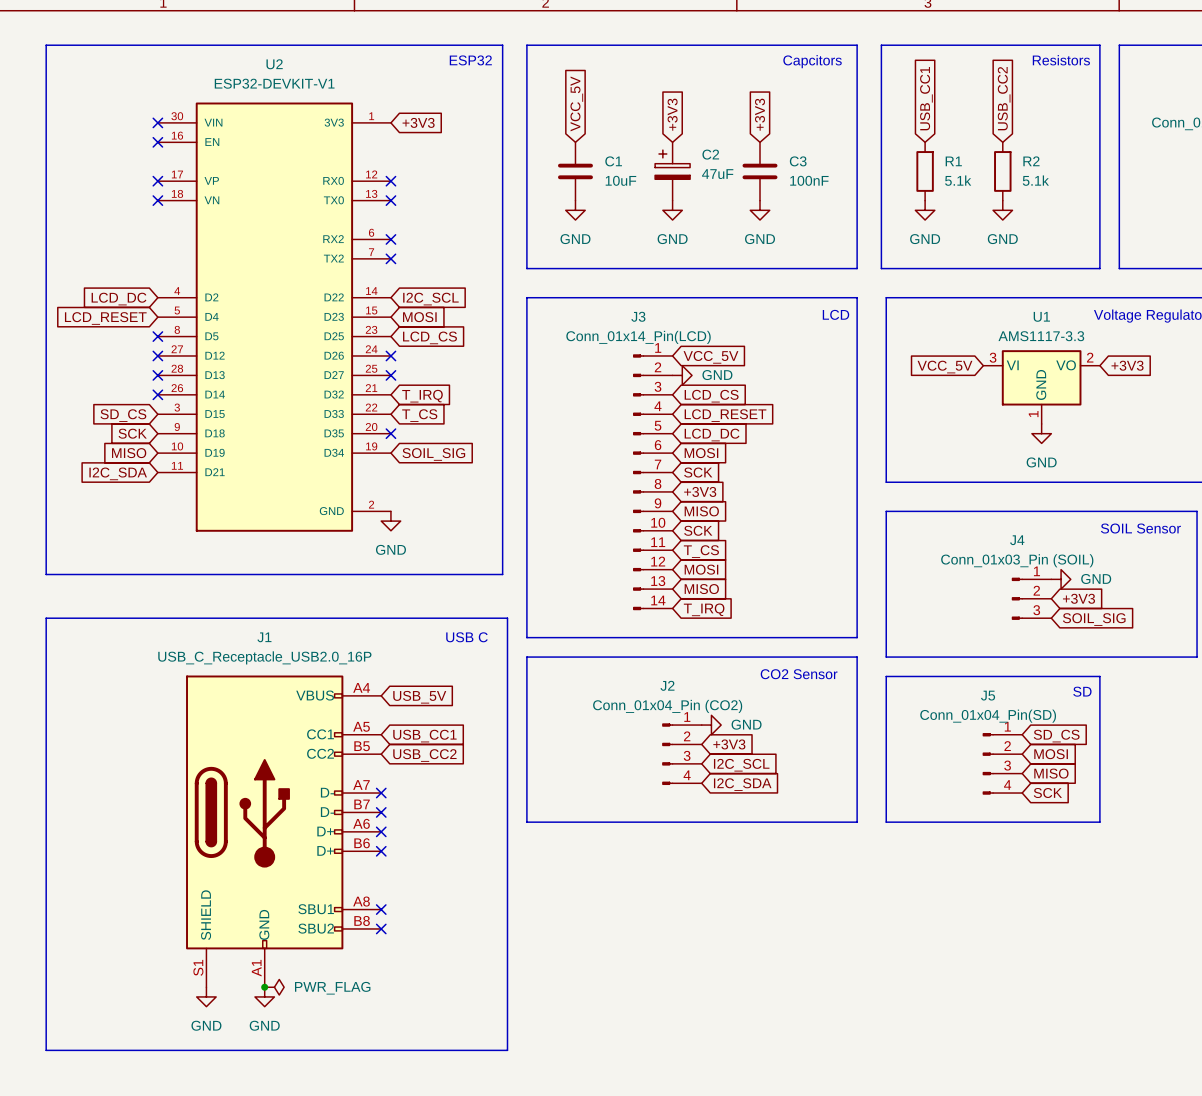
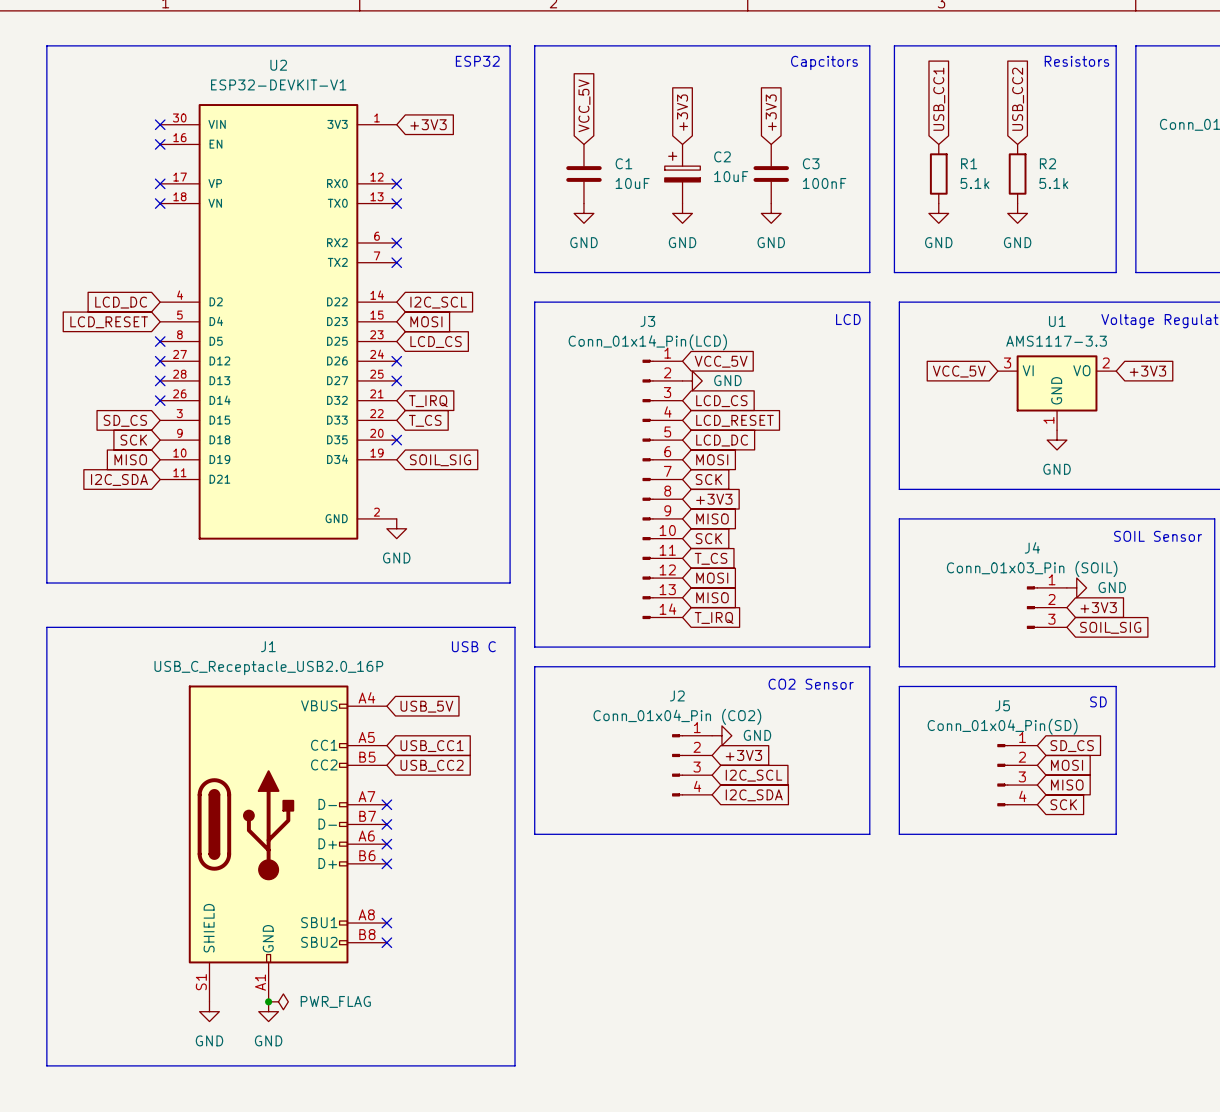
C2 value: 47uF (717, 174) -> 10uF (731, 176)

